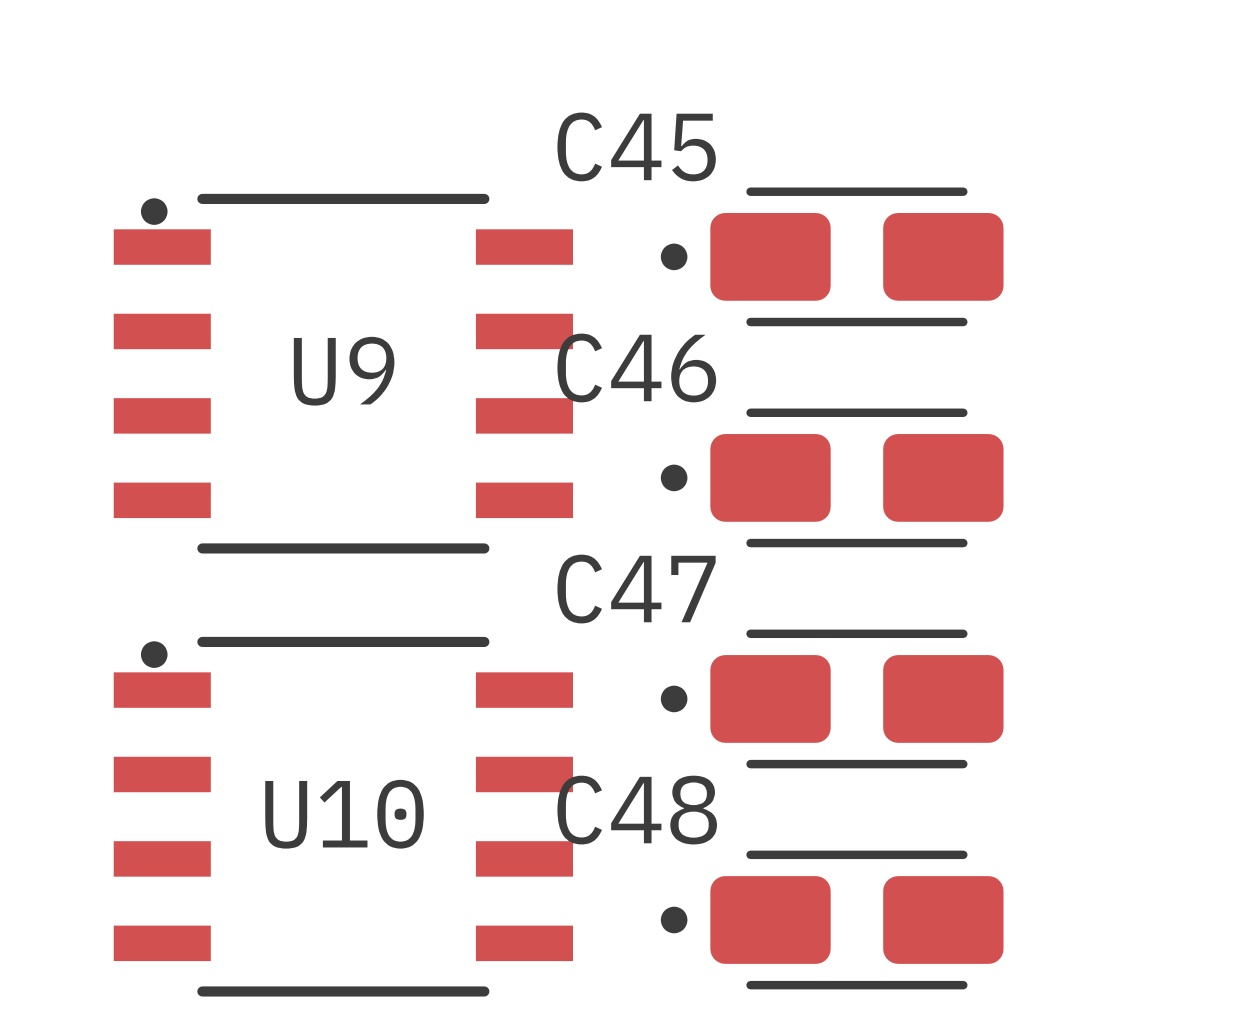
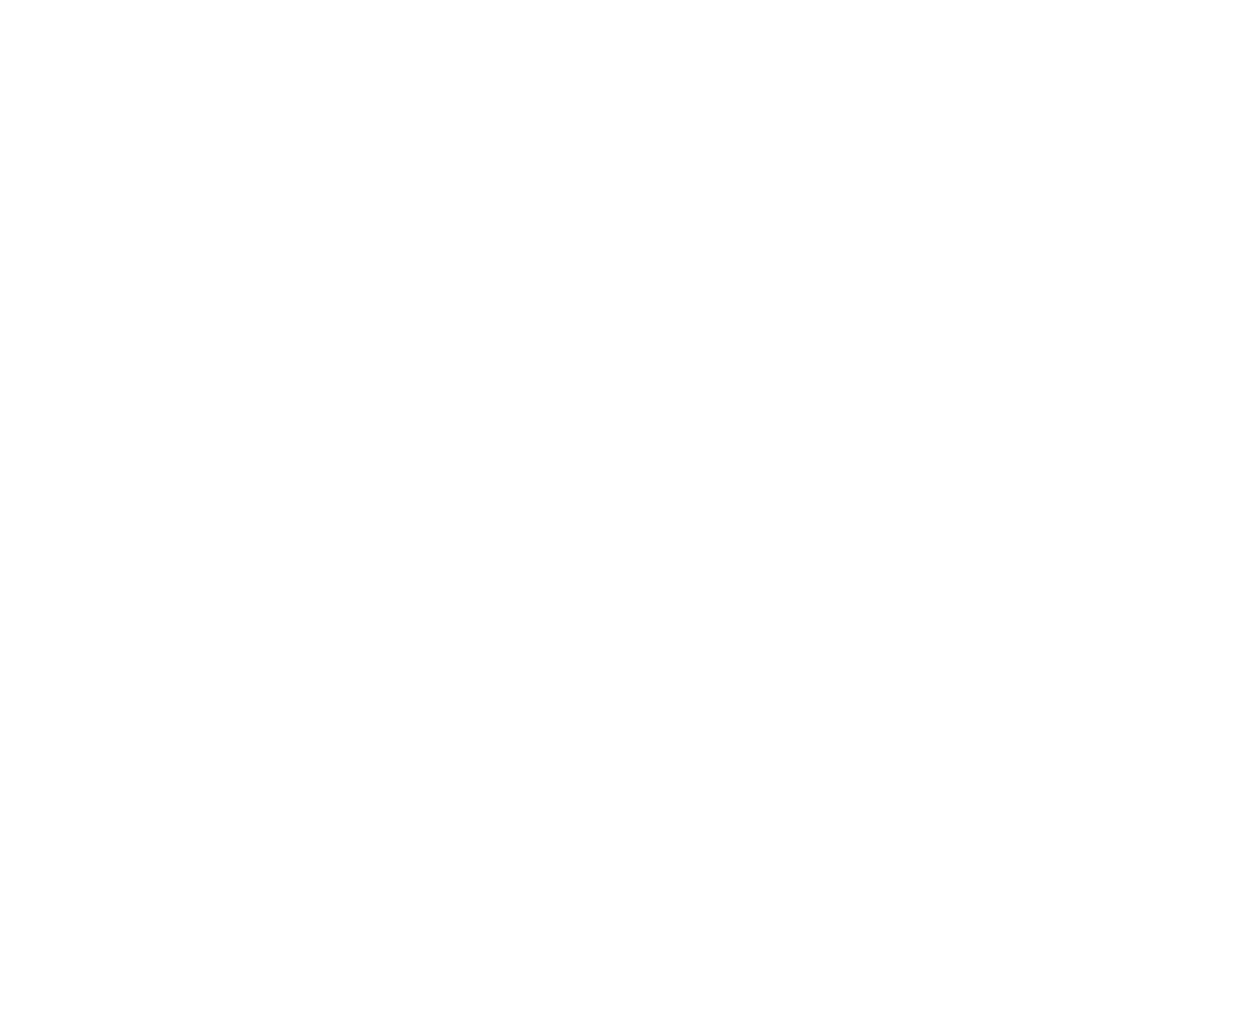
C45: (832, 256) -> none
U9: (343, 373) -> none
C46: (832, 477) -> none
C47: (832, 698) -> none
U10: (343, 816) -> none
C48: (832, 919) -> none

